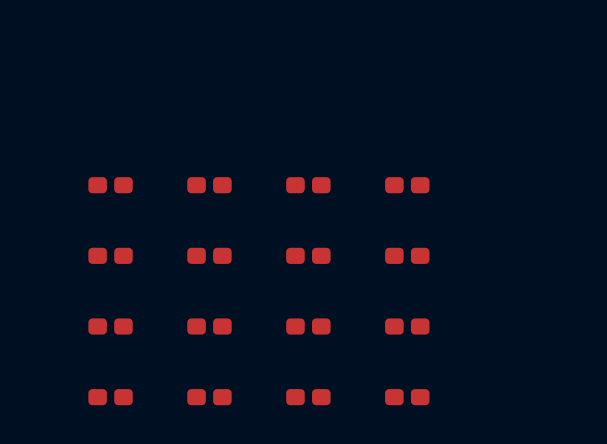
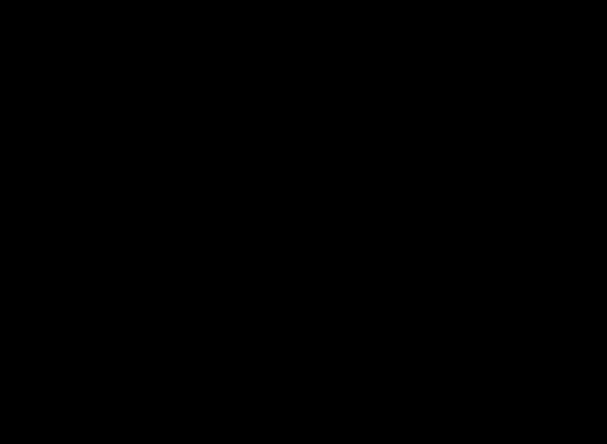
part: (110, 185) -> none
part: (209, 185) -> none
part: (308, 185) -> none
part: (407, 185) -> none
part: (110, 255) -> none
part: (209, 255) -> none
part: (308, 255) -> none
part: (407, 255) -> none
part: (110, 326) -> none
part: (209, 326) -> none
part: (308, 326) -> none
part: (407, 326) -> none
part: (110, 397) -> none
part: (209, 397) -> none
part: (308, 397) -> none
part: (407, 397) -> none

